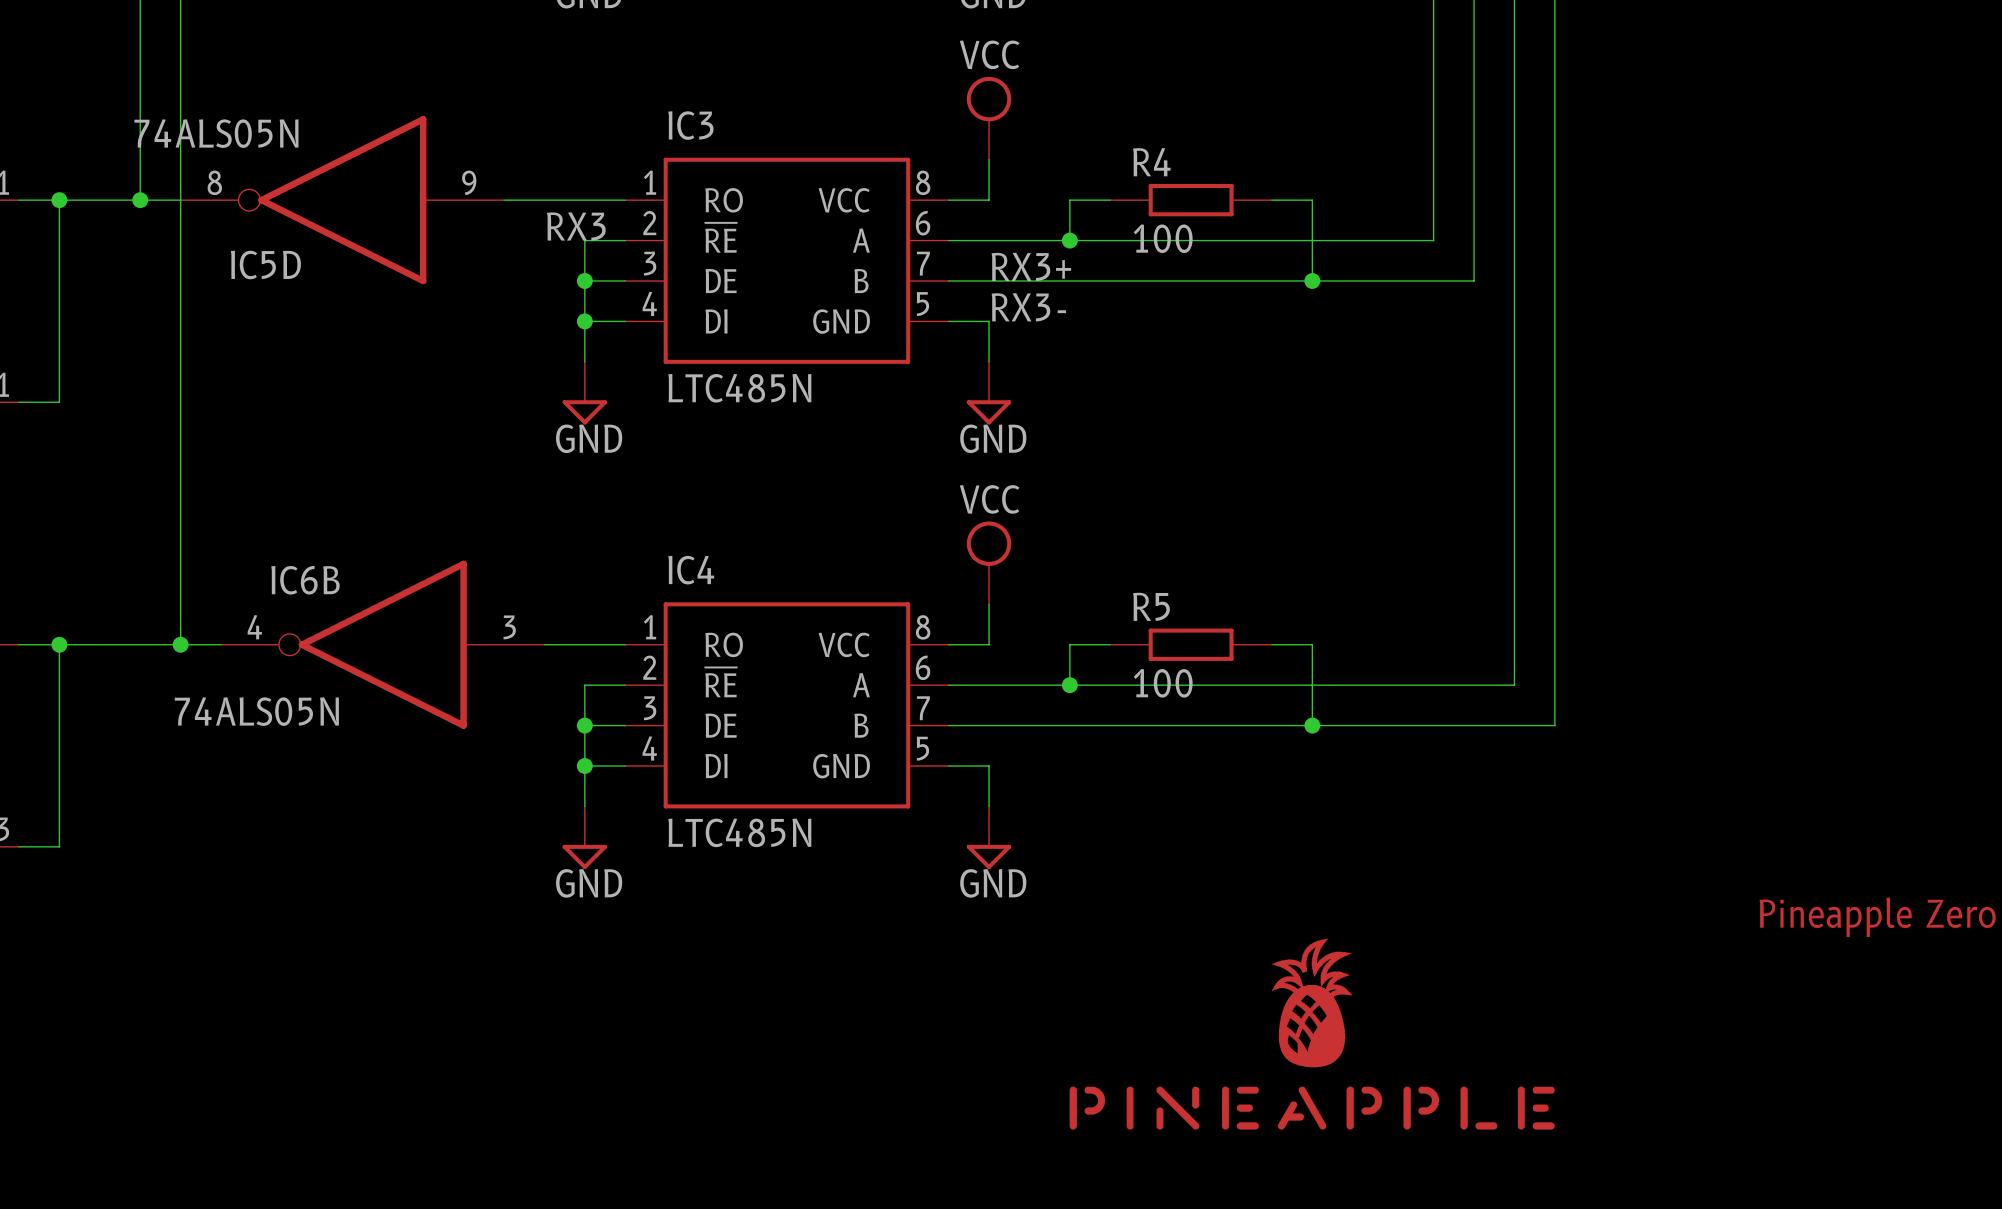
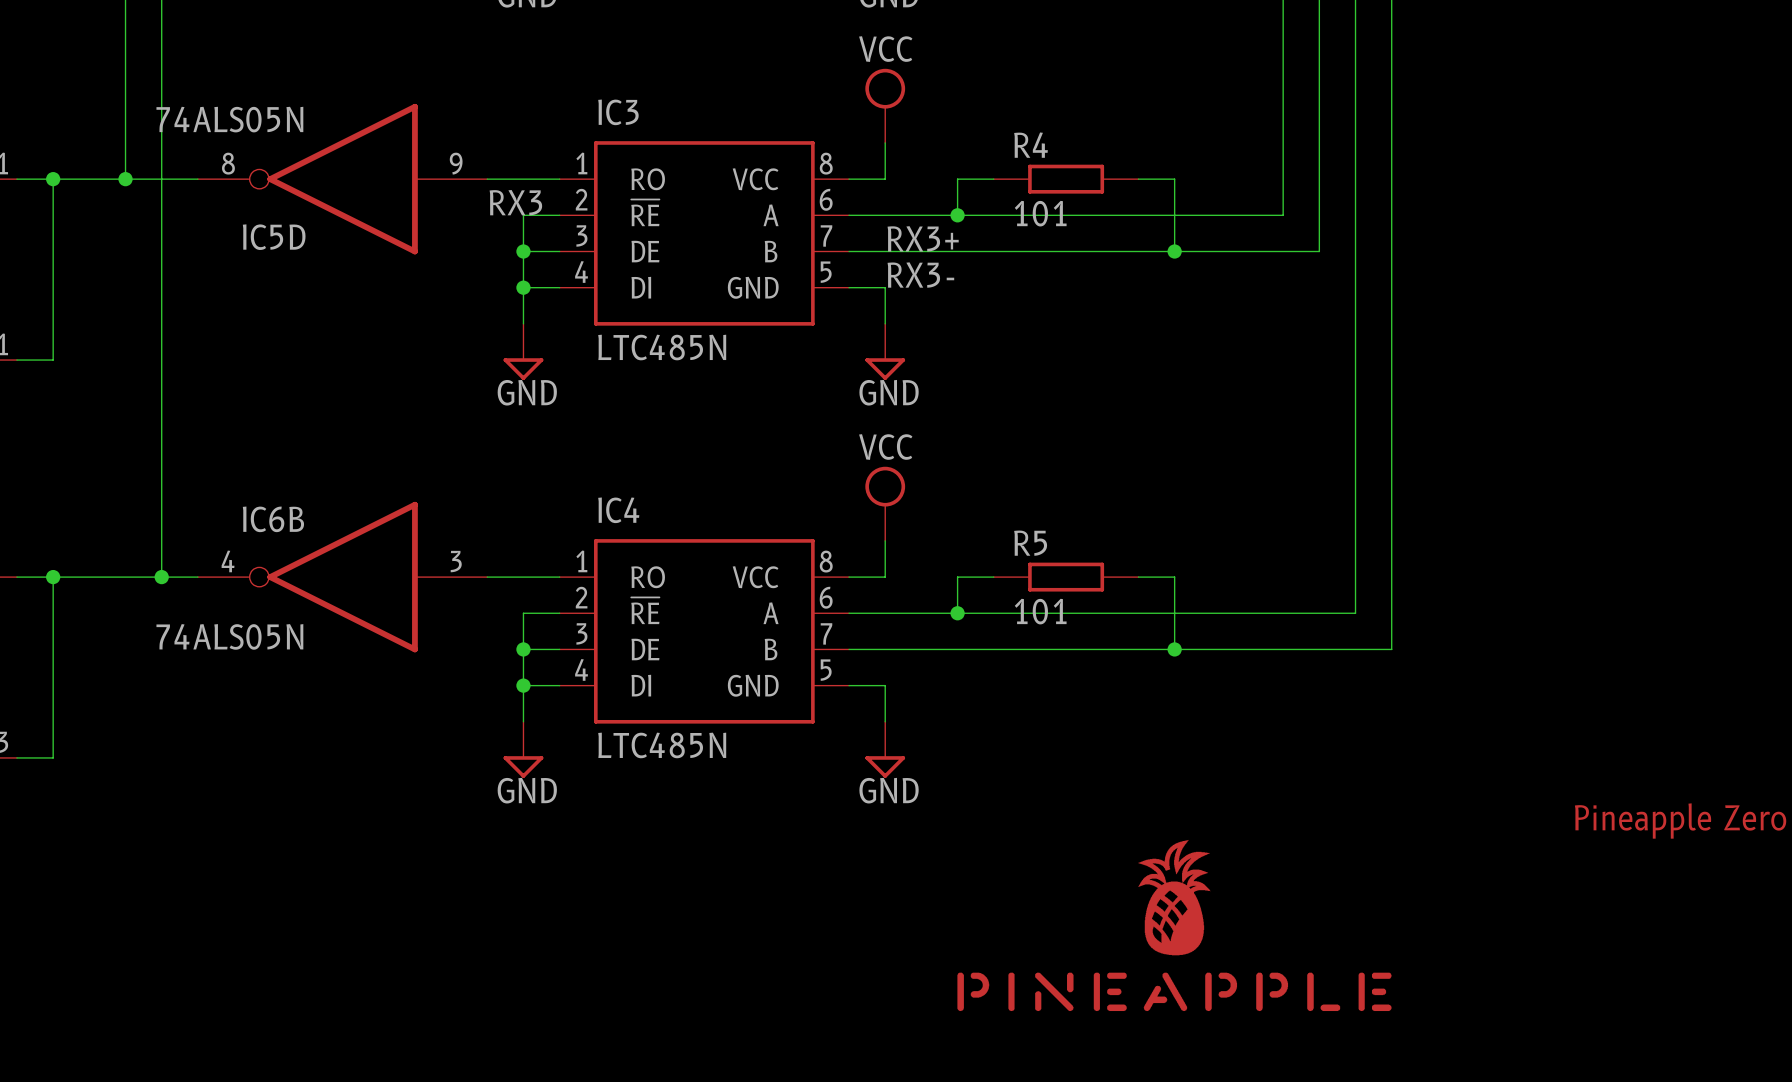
IC5D position: (342, 200) -> (342, 179)
R4 value: 100 (1163, 238) -> 101 (1040, 213)
R5 value: 100 (1163, 683) -> 101 (1040, 611)

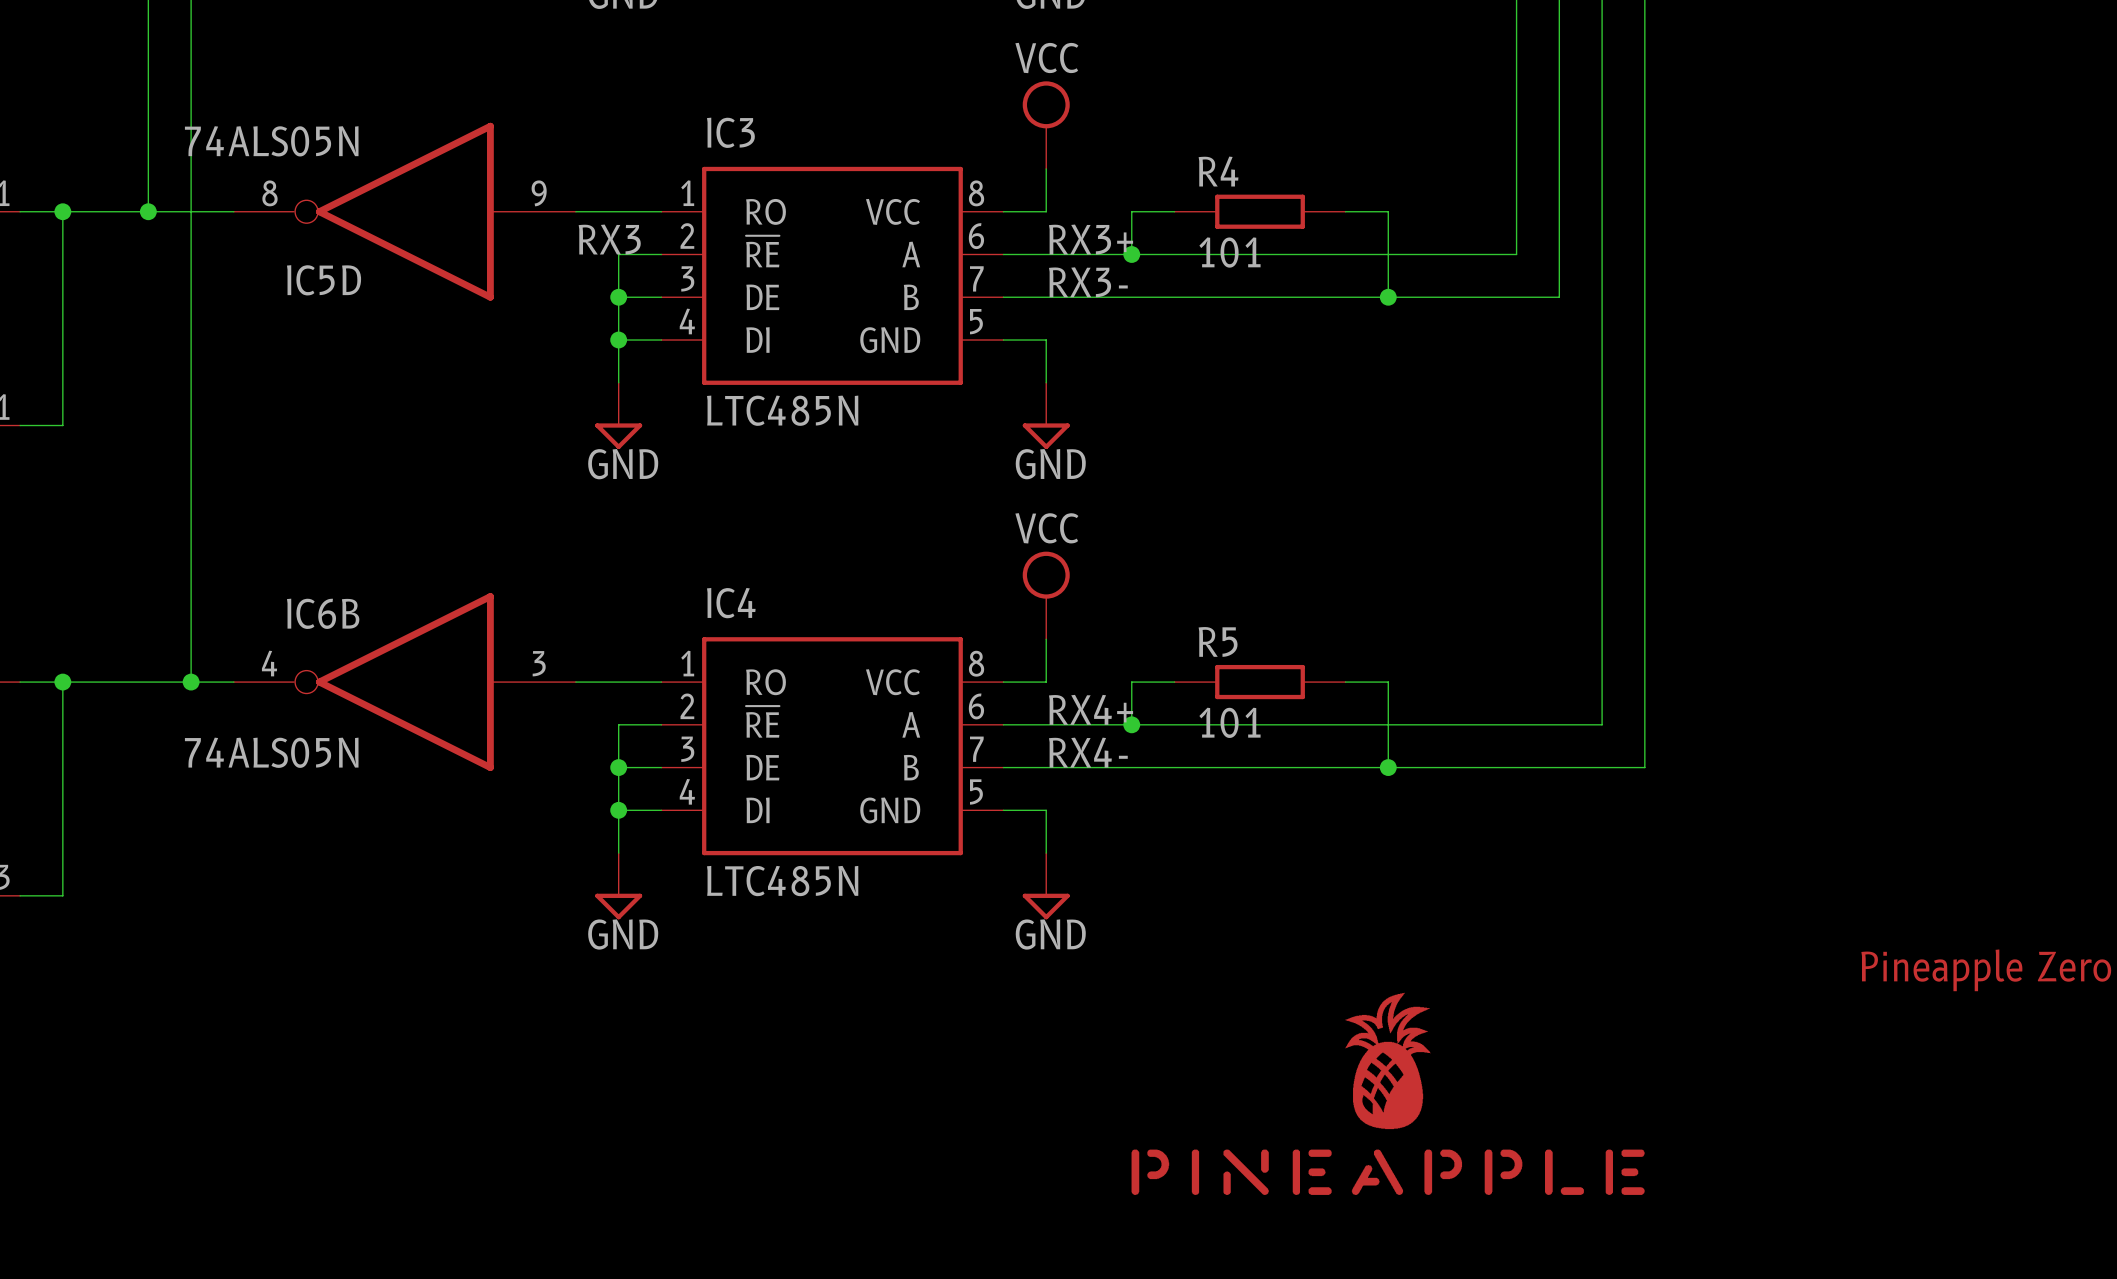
label: none -> RX3+ (1091, 239)
label: RX3+ (923, 238) -> RX3- (1088, 282)
label: RX3- (920, 275) -> none
label: none -> RX4+ (1091, 709)
label: none -> RX4- (1088, 752)

